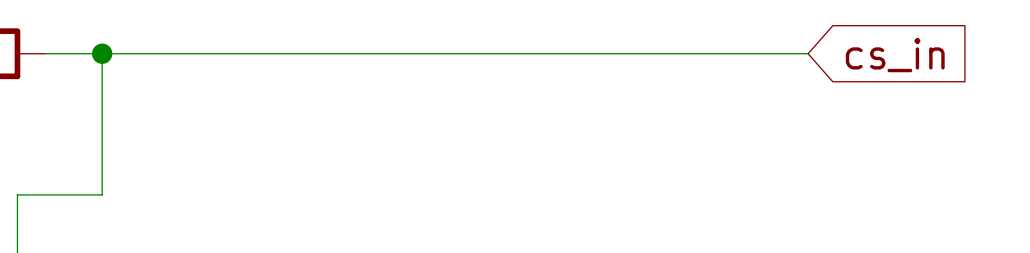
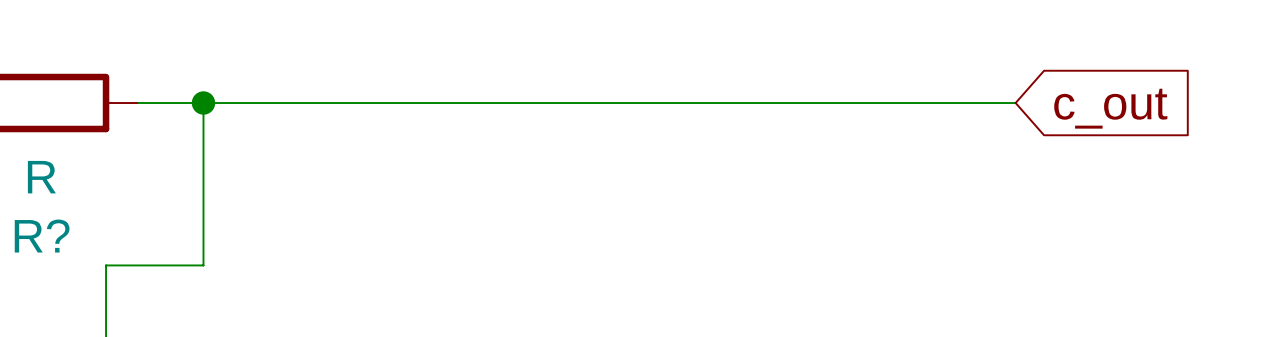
global label: cs_in (895, 55) -> c_out (1110, 108)

